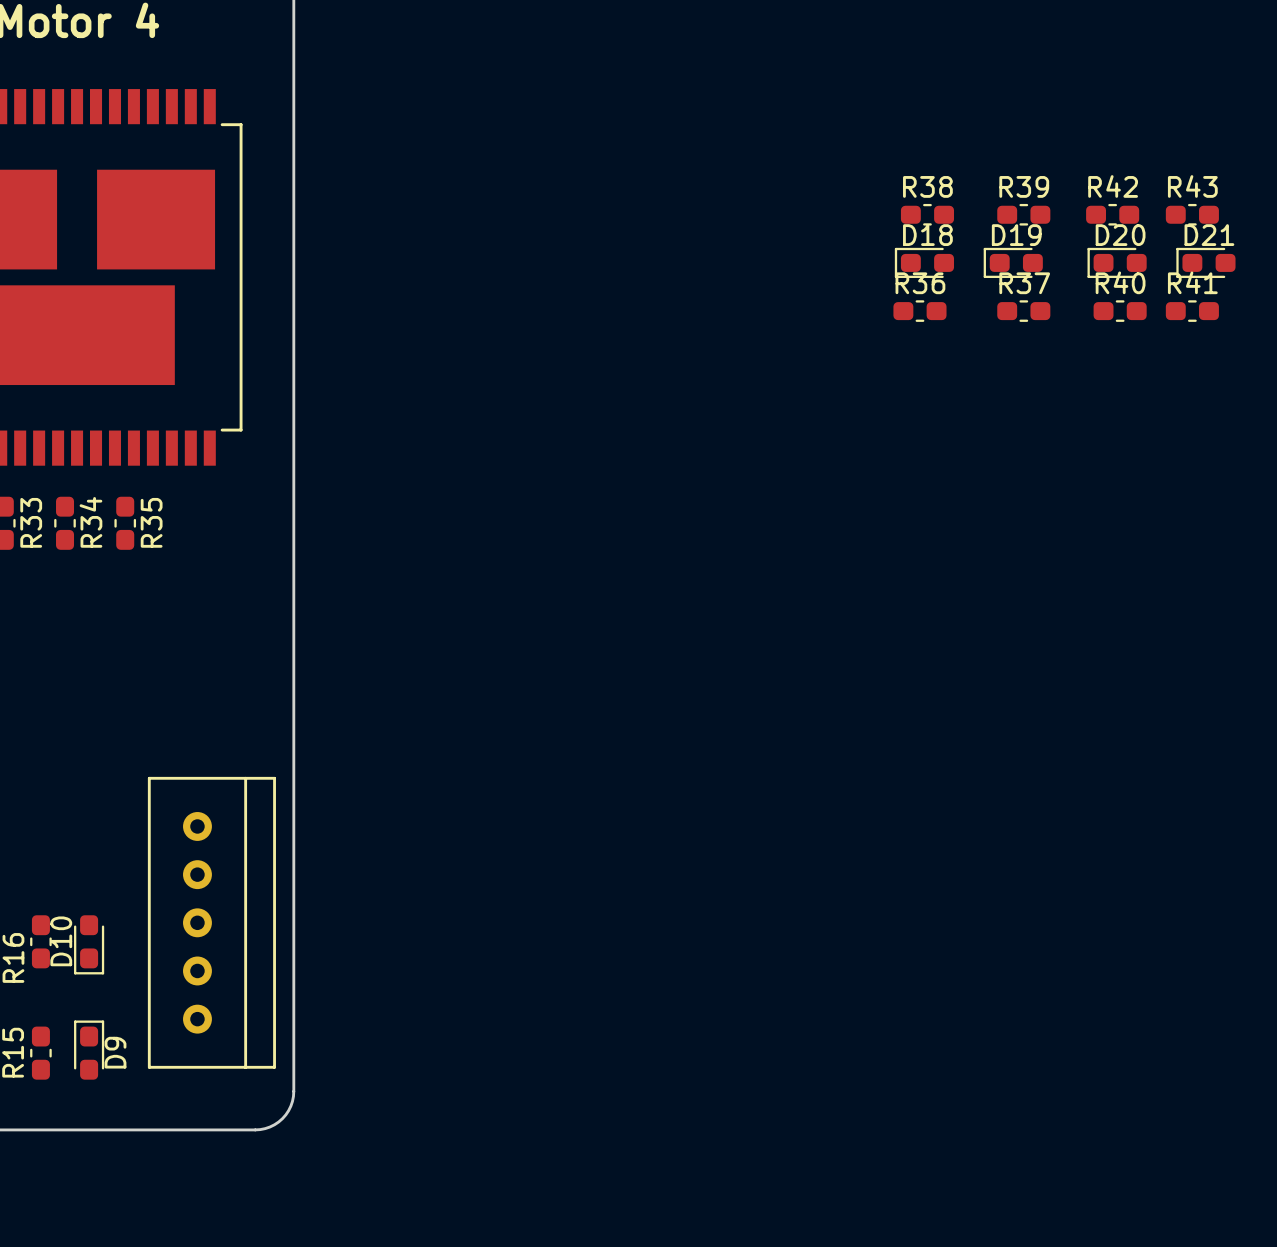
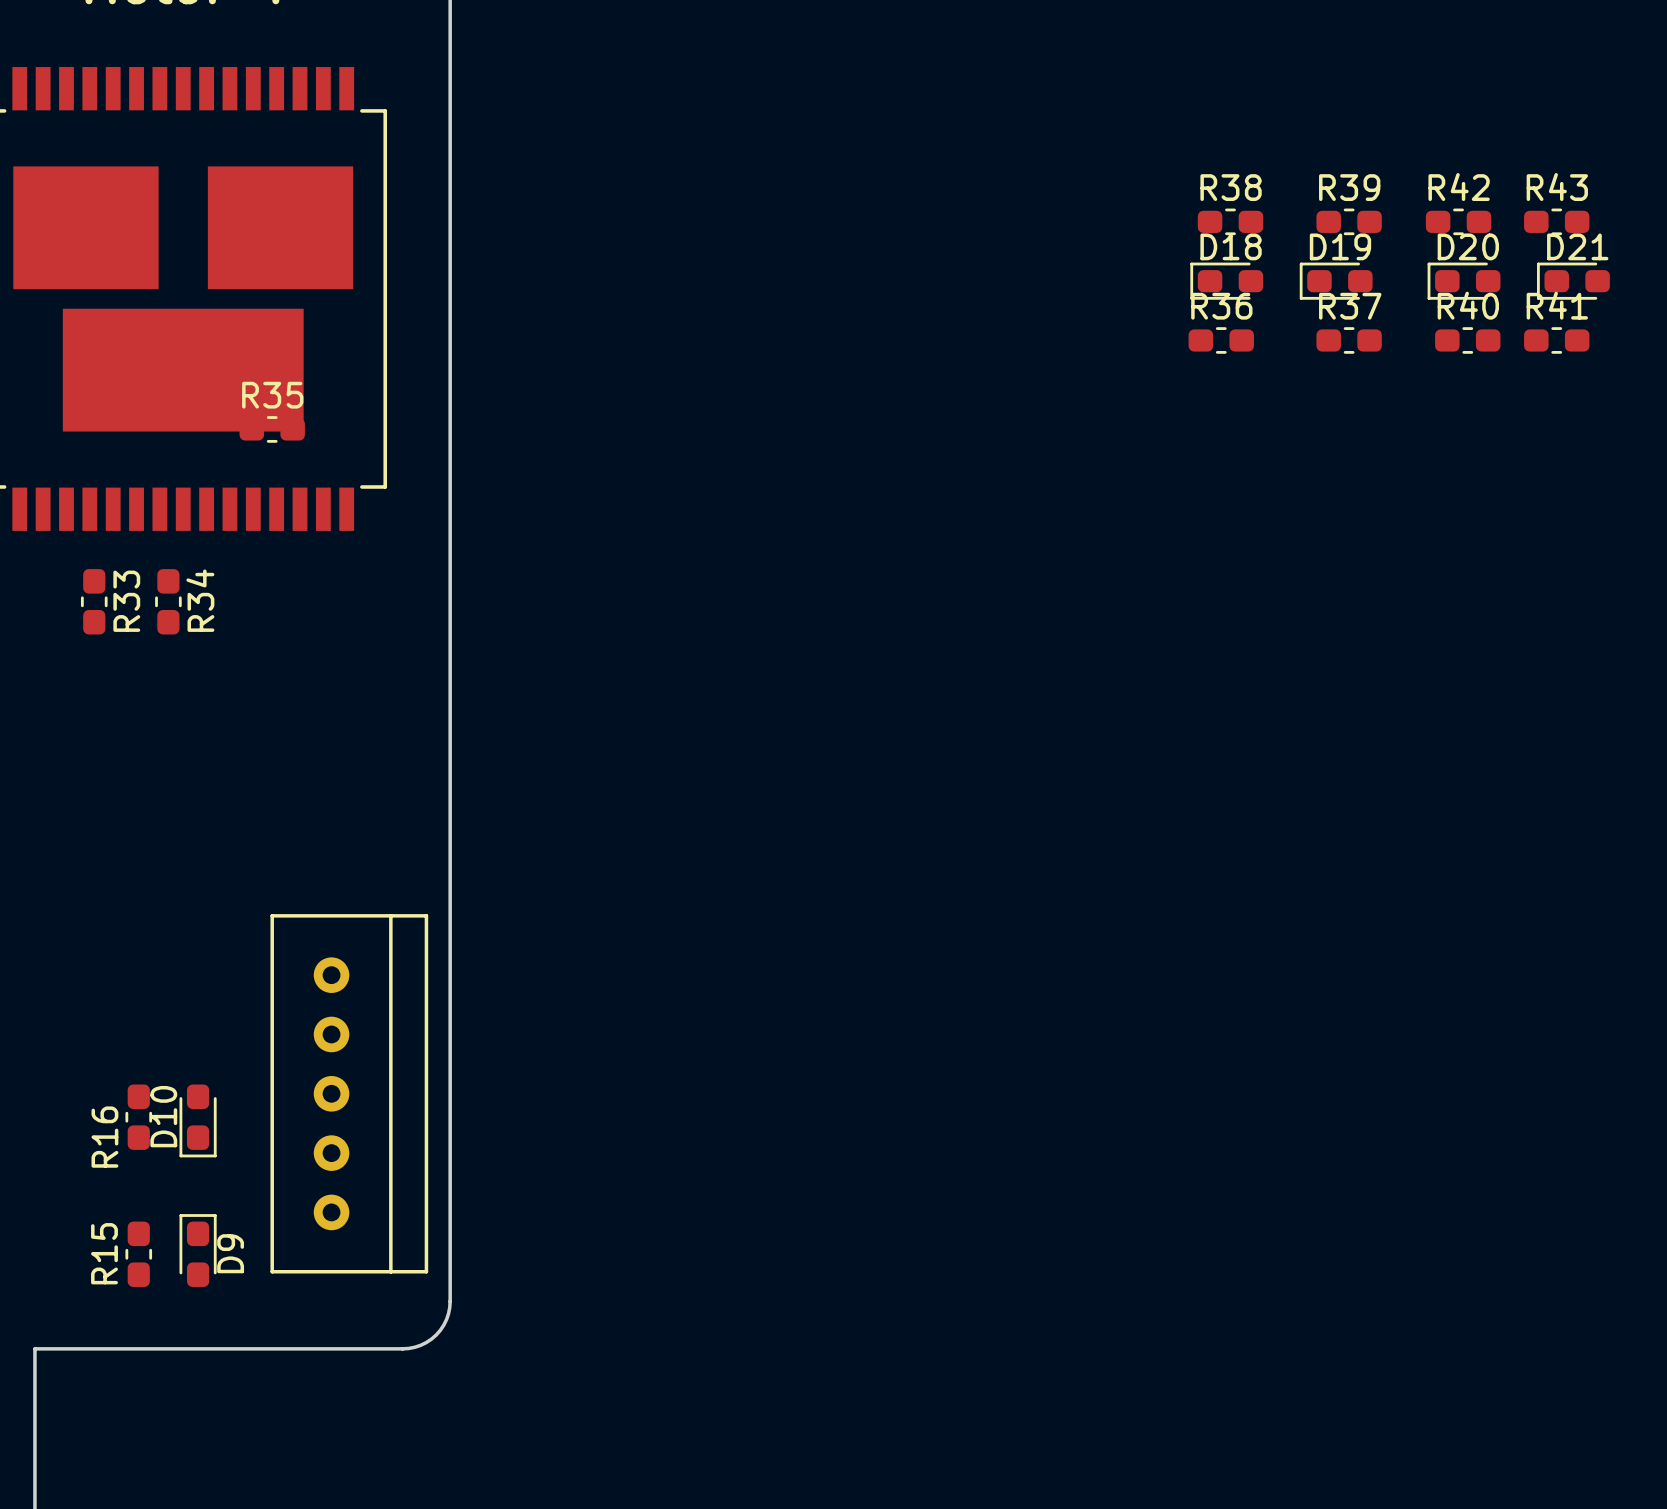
R35 name position: R35 (151, 522) -> R35 (272, 395)
R35 rotation: 0° (125, 523) -> 90° clockwise (272, 429)
R35 position: (125, 523) -> (272, 429)

